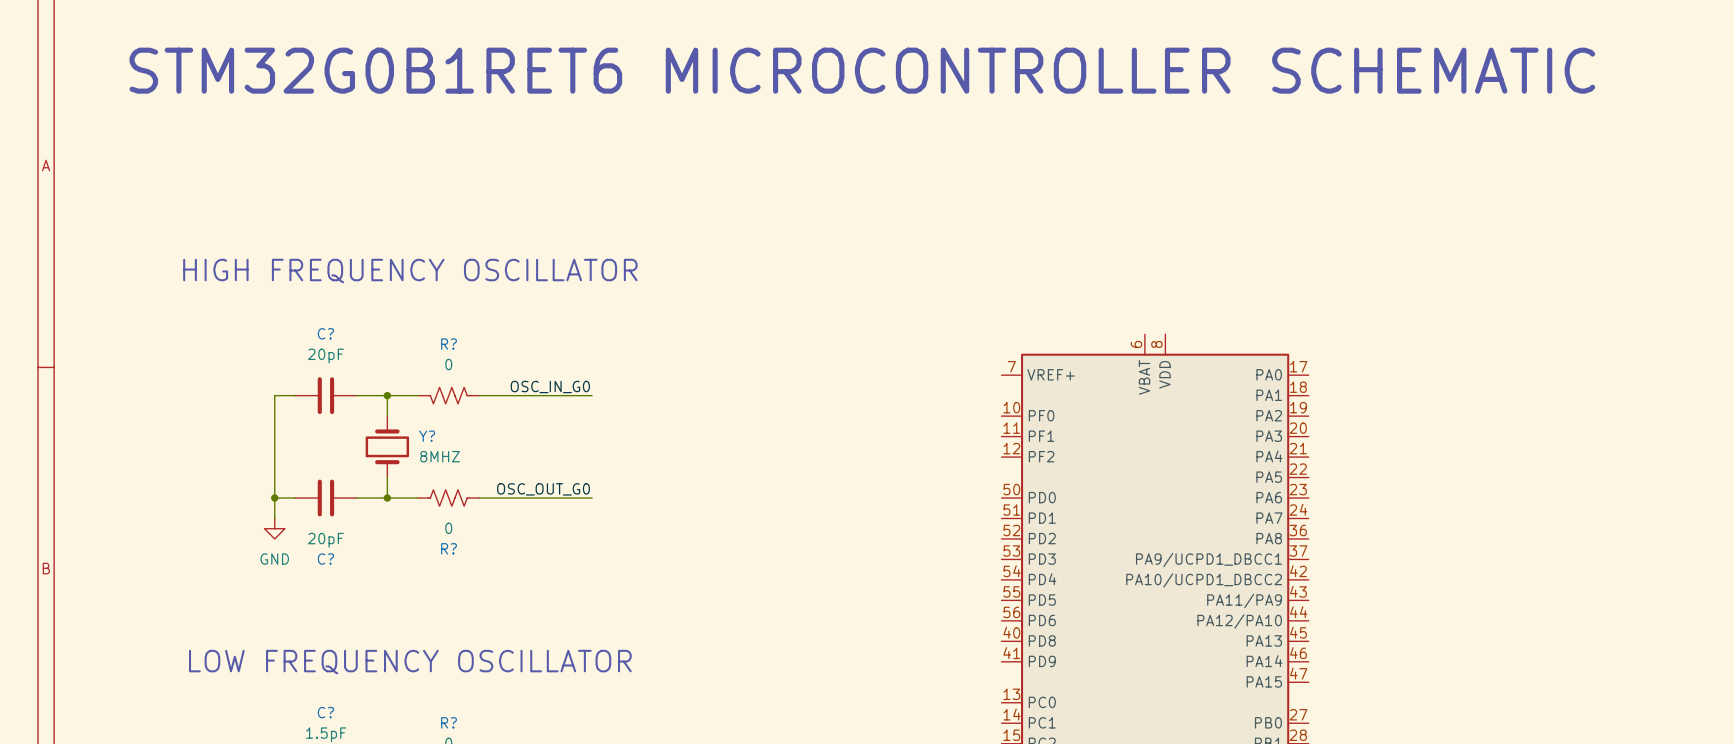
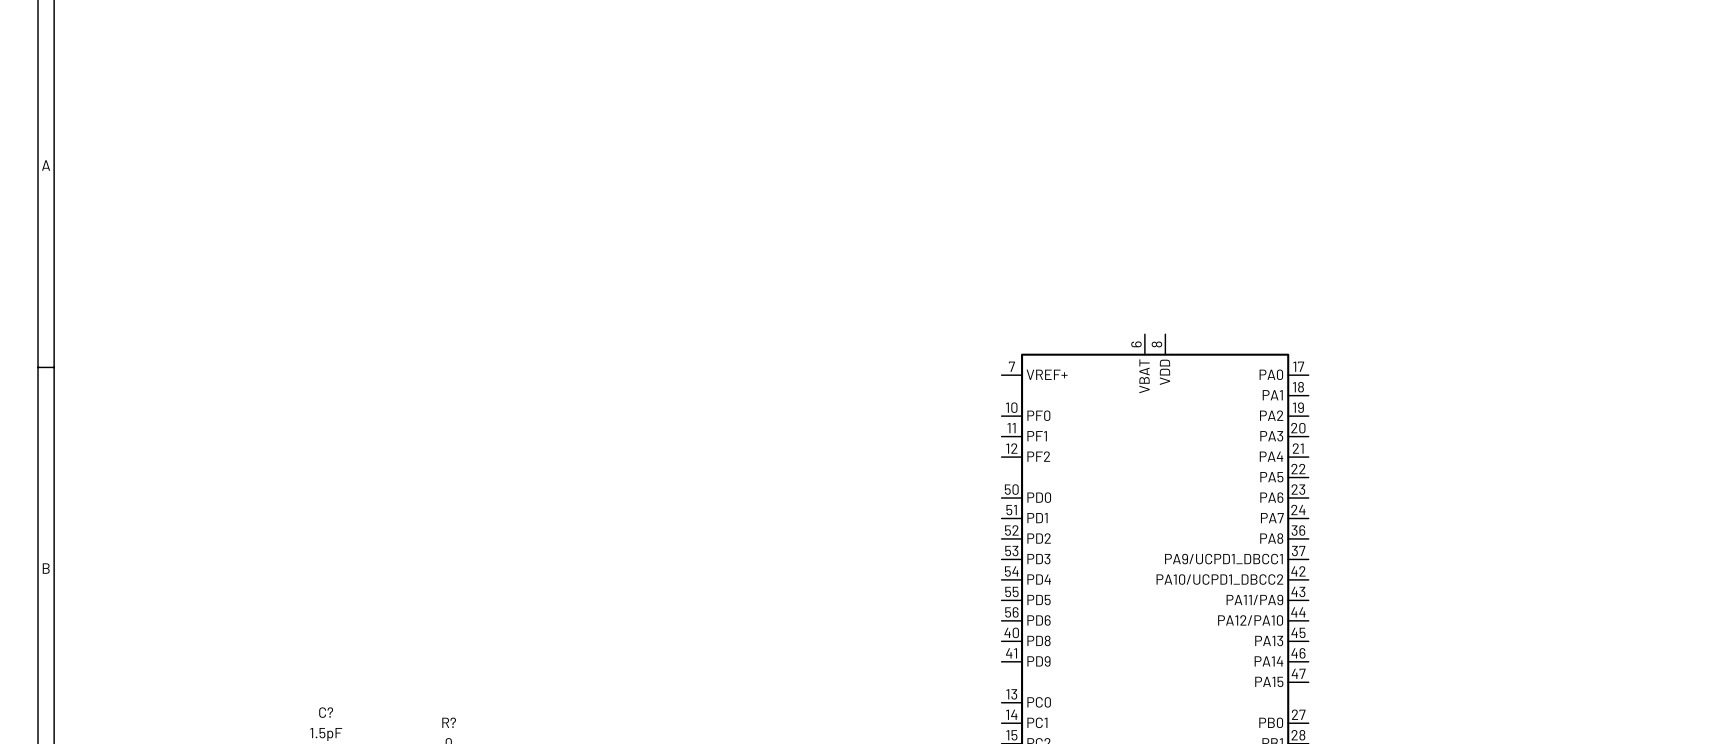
text: STM32G0B1RET6 MICROCONTROLLER SCHEMATIC (862, 70) -> none
text: HIGH FREQUENCY OSCILLATOR (410, 270) -> none
label: OSC_IN_G0 (550, 386) -> none
wire: (295, 395) (274, 395) (274, 518) -> none
C?: 20pF (325, 395) -> none
wire: (356, 395) (418, 395) -> none
wire: (387, 395) (387, 416) -> none
junction: (387, 395) -> none
R?: 0 (448, 395) -> none
wire: (479, 395) (592, 395) -> none
Y?: 8MHZ (387, 446) -> none
wire: (387, 477) (387, 498) -> none
label: OSC_OUT_G0 (543, 489) -> none
wire: (274, 498) (295, 498) -> none
junction: (274, 498) -> none
C?: 20pF (325, 498) -> none
wire: (356, 498) (418, 498) -> none
junction: (387, 498) -> none
R?: 0 (448, 498) -> none
wire: (479, 498) (592, 498) -> none
power symbol: GND (274, 528) -> none
text: LOW FREQUENCY OSCILLATOR (410, 662) -> none

